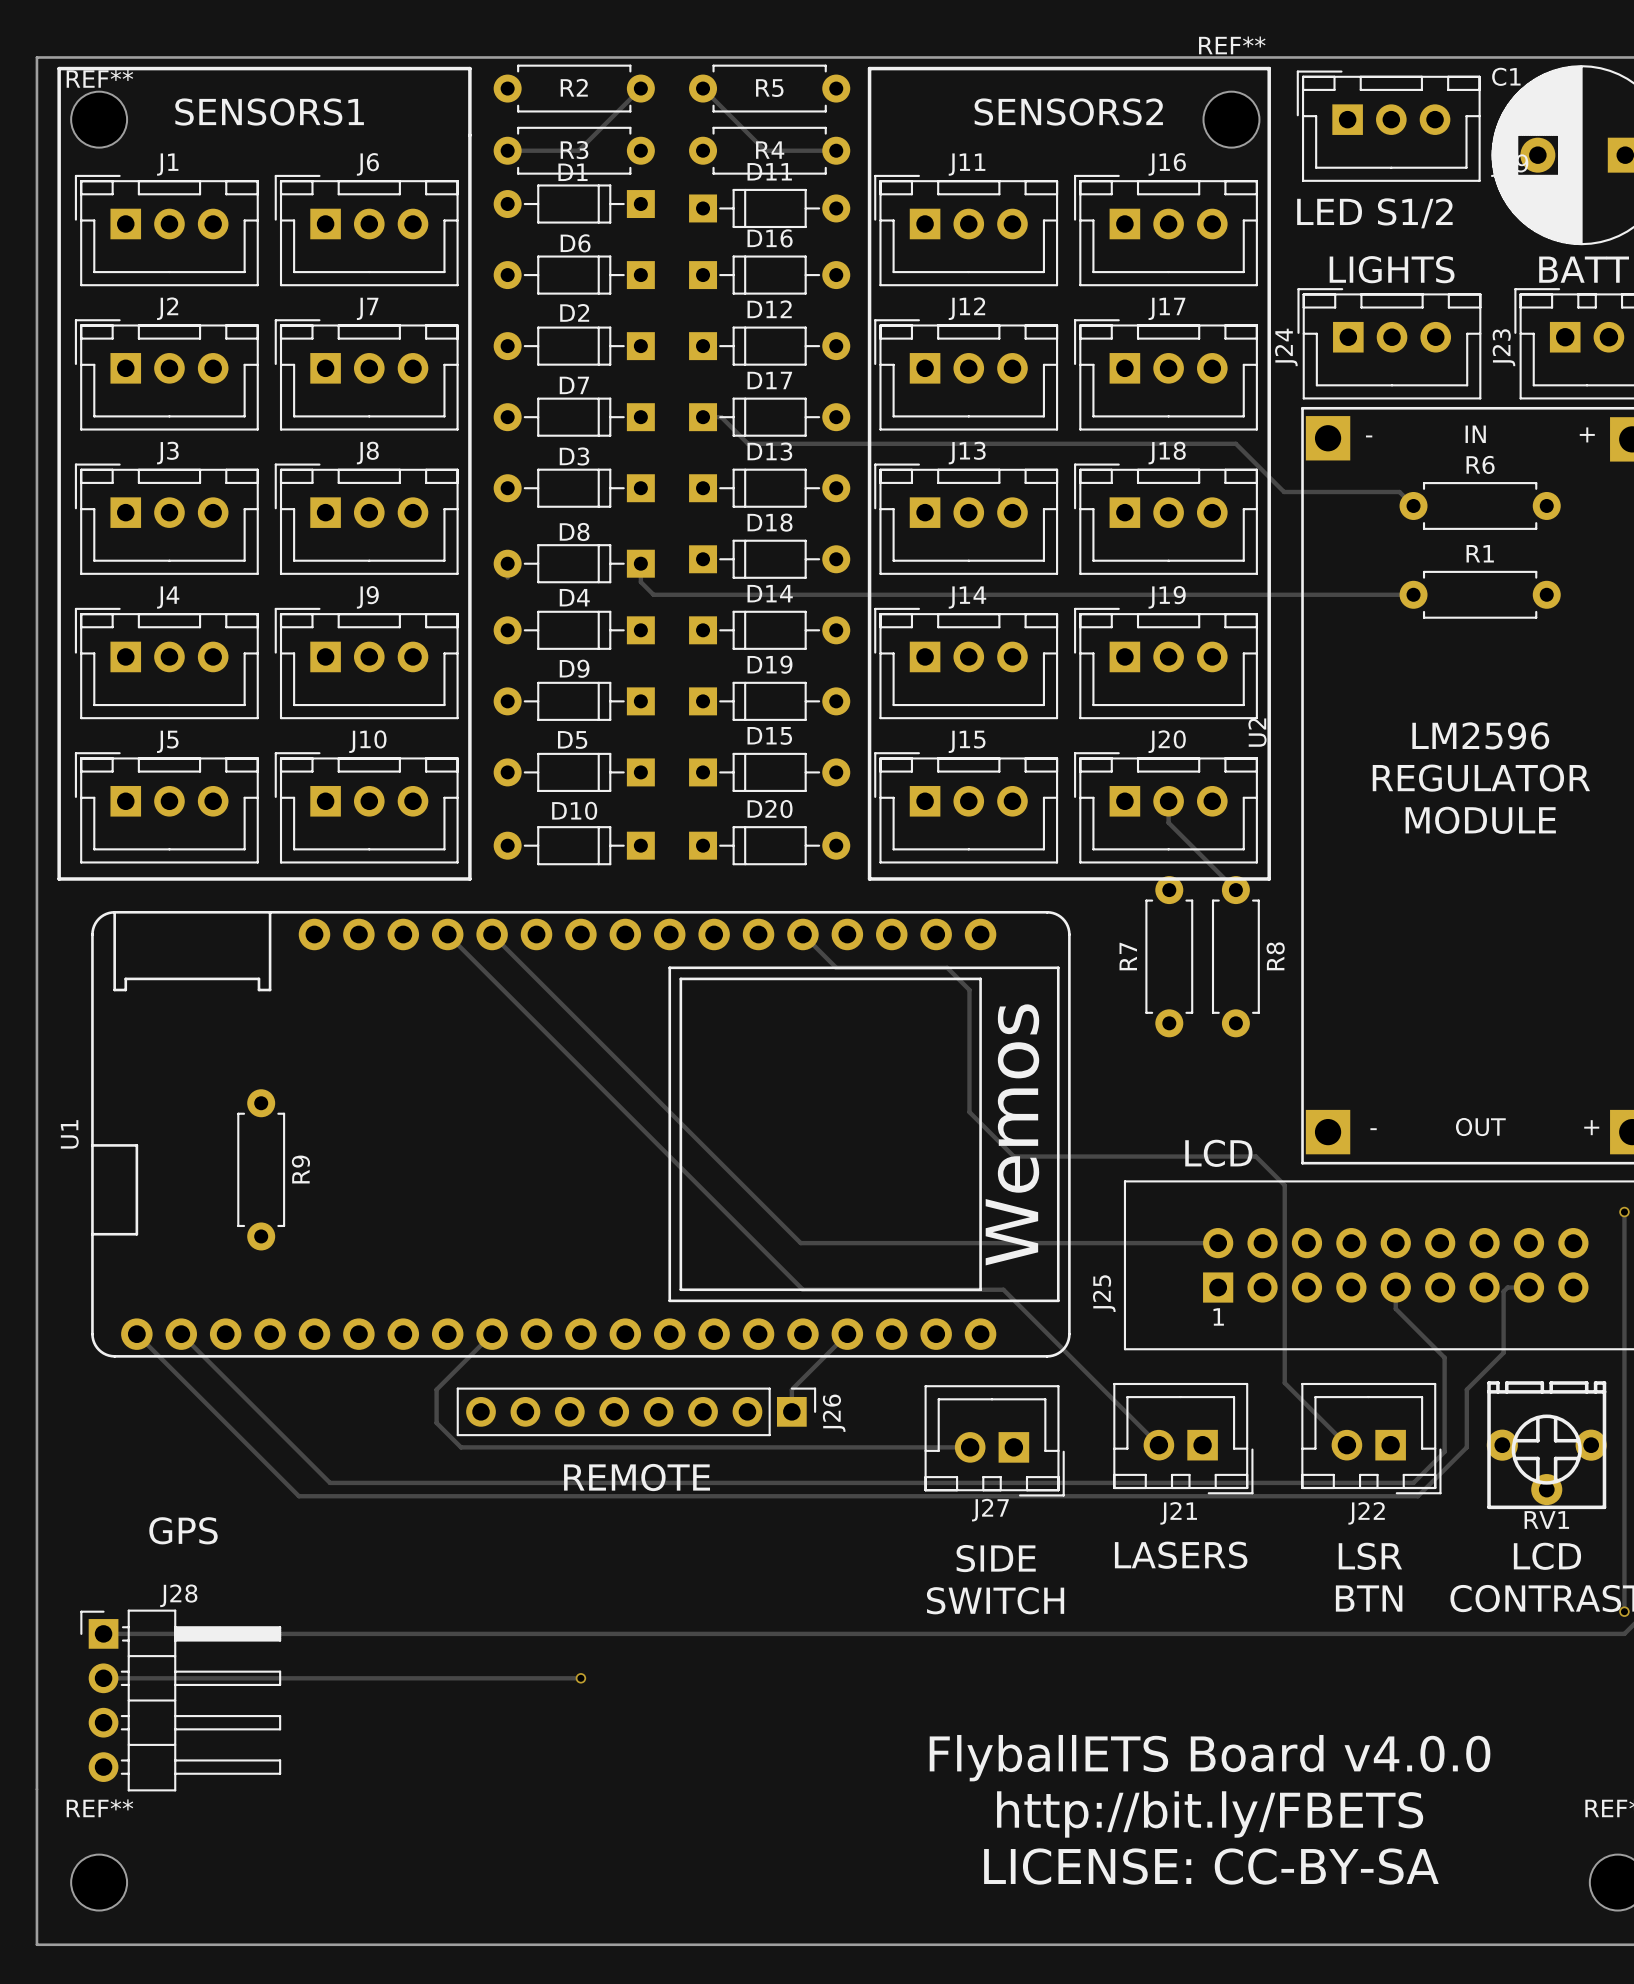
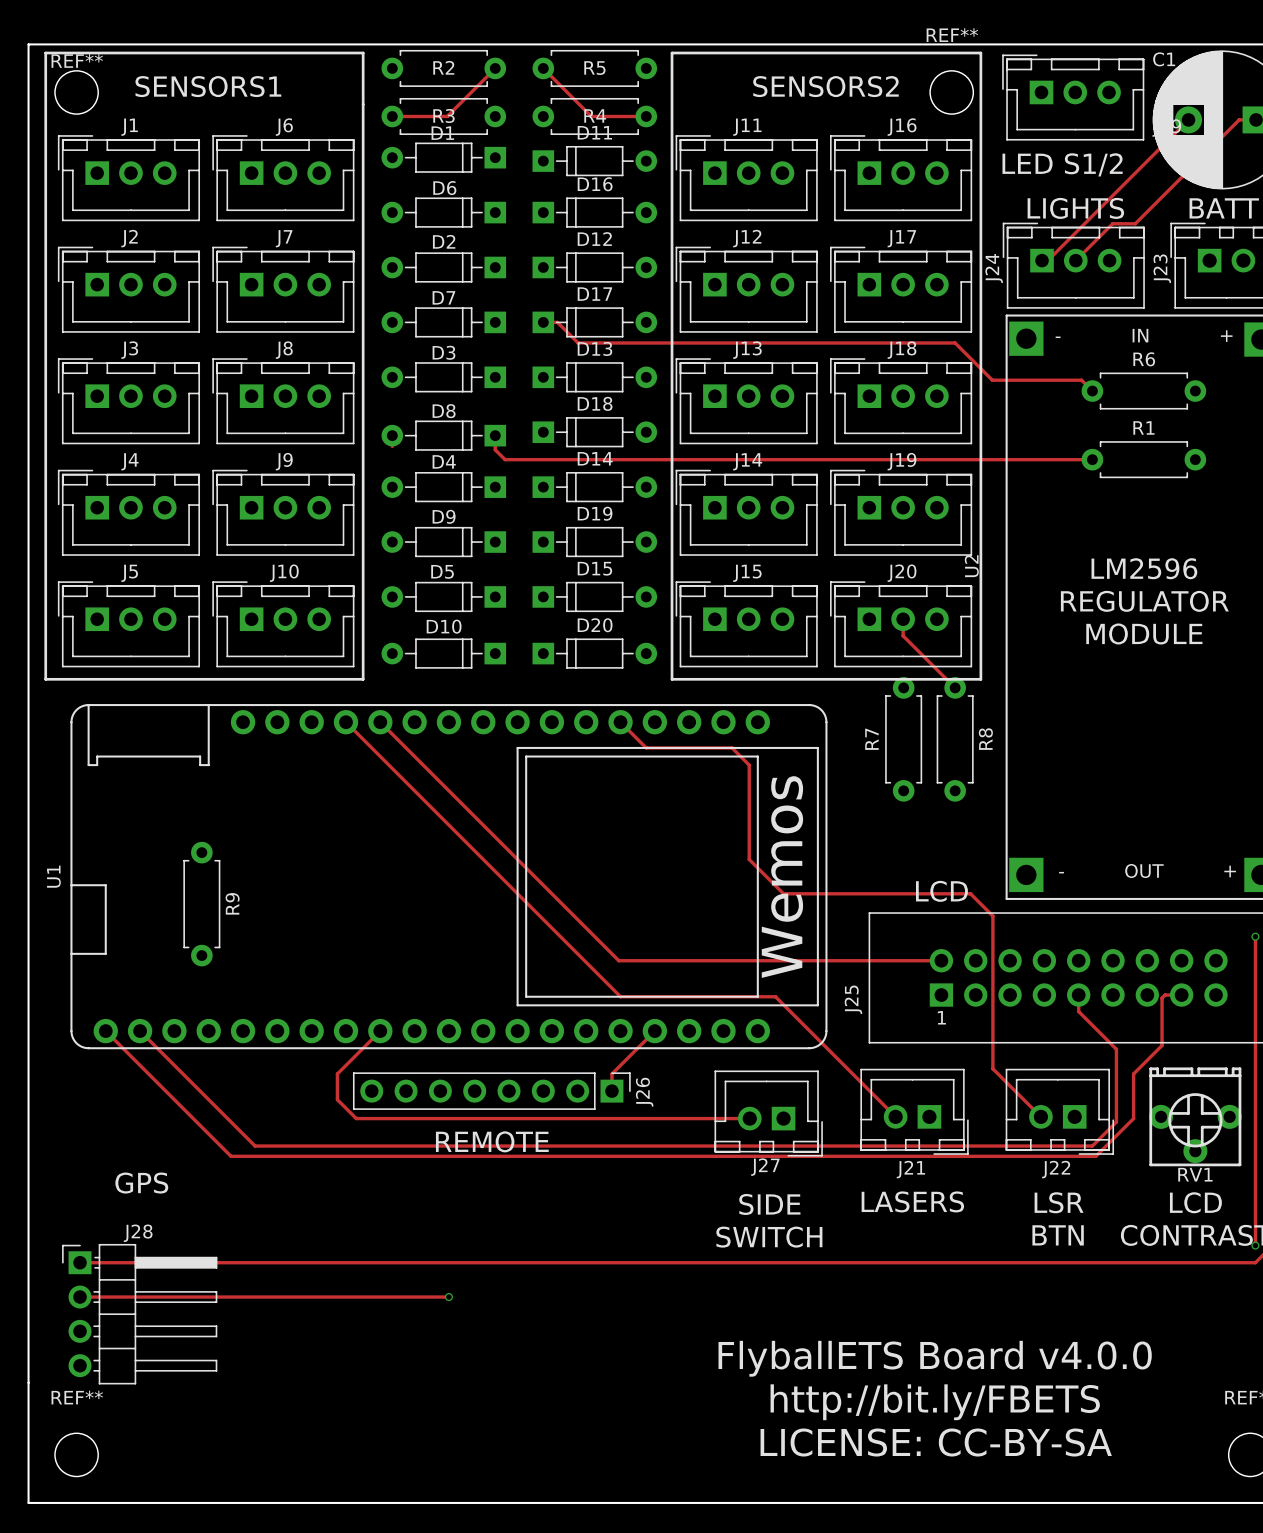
track: none -> (1188, 119) (1047, 260)
track: none -> (1256, 119) (1239, 119) (1135, 223) (1112, 223) (1075, 260)

